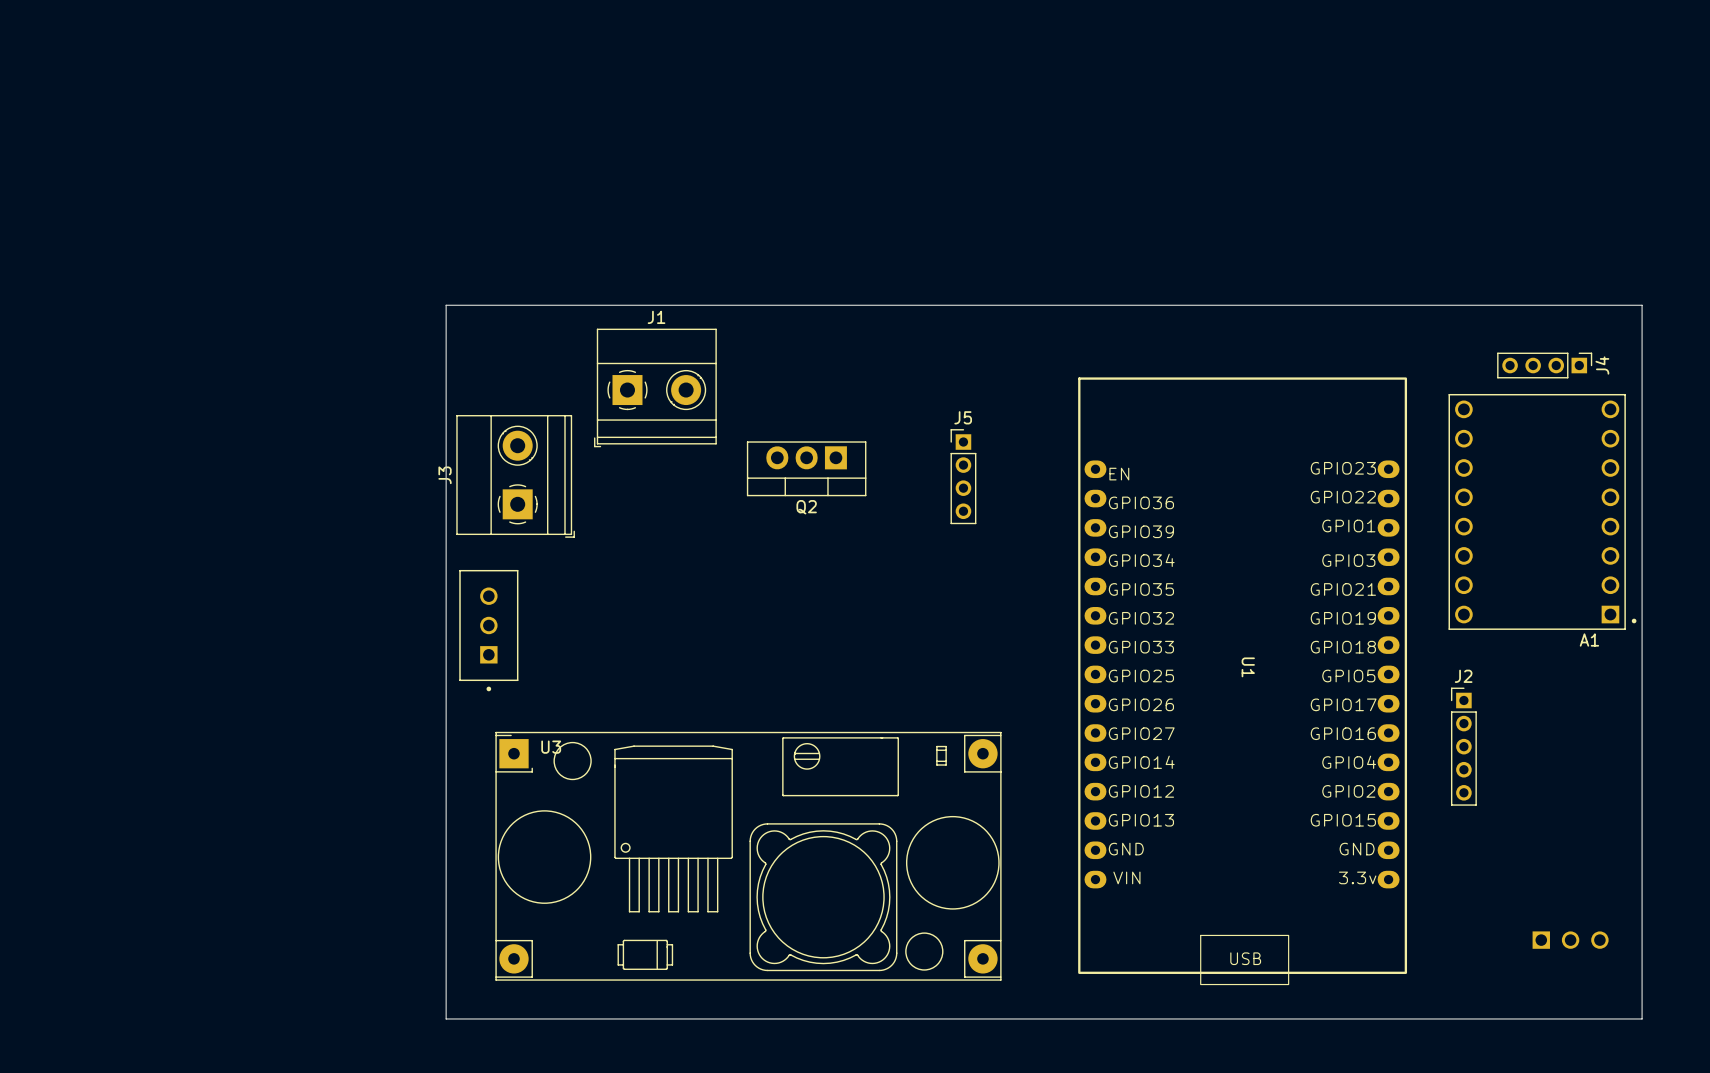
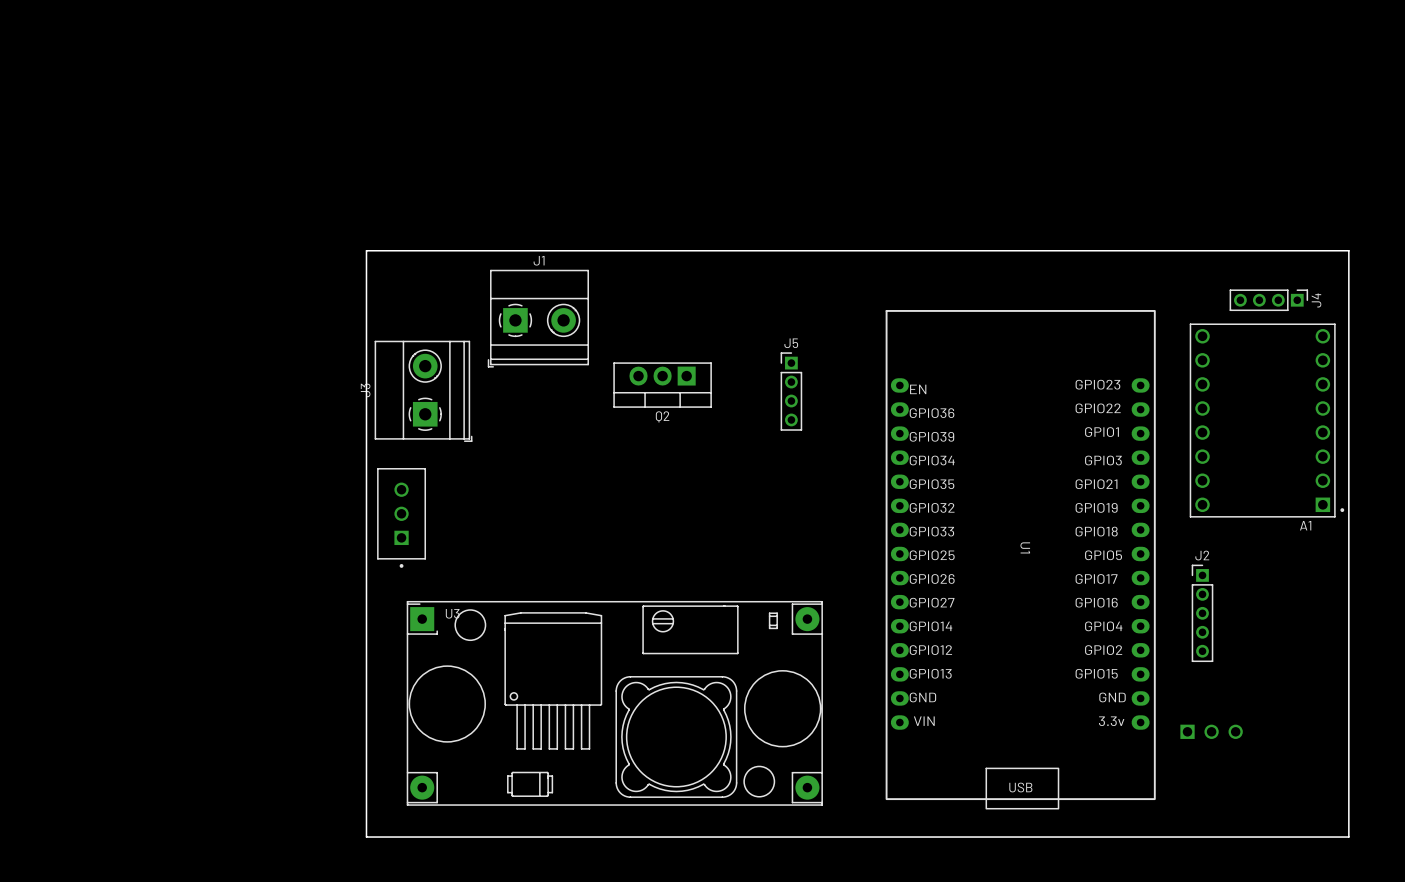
part position: (1570, 940) -> (1211, 731)

